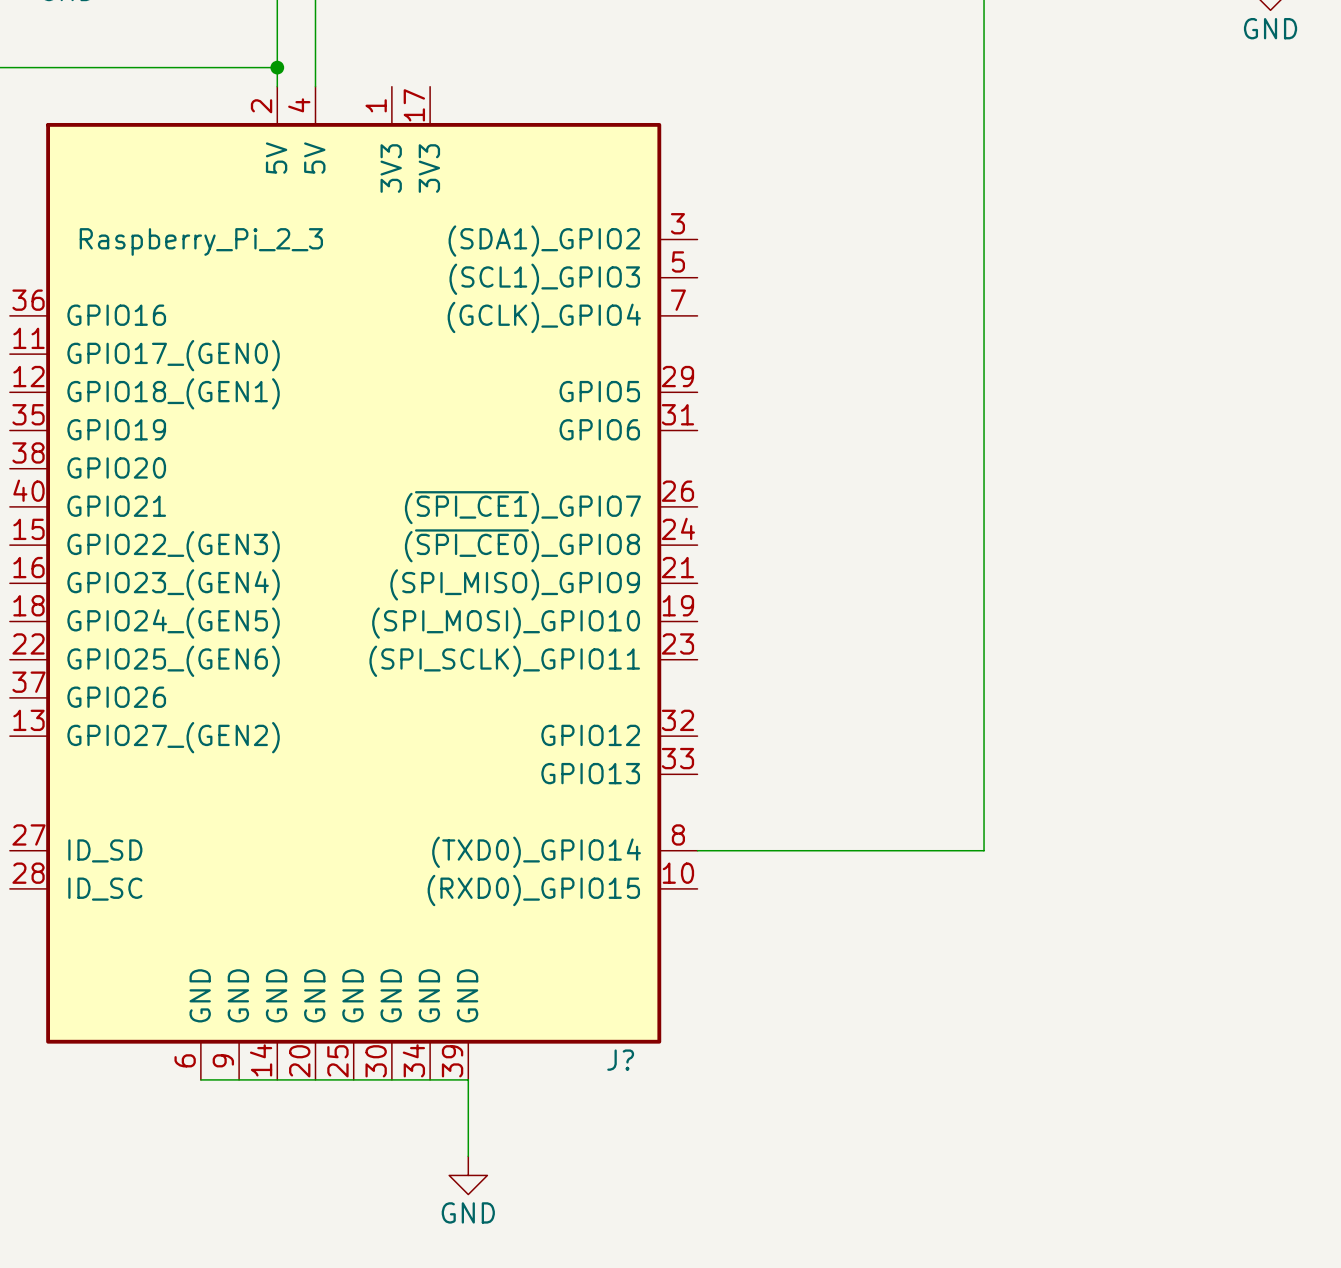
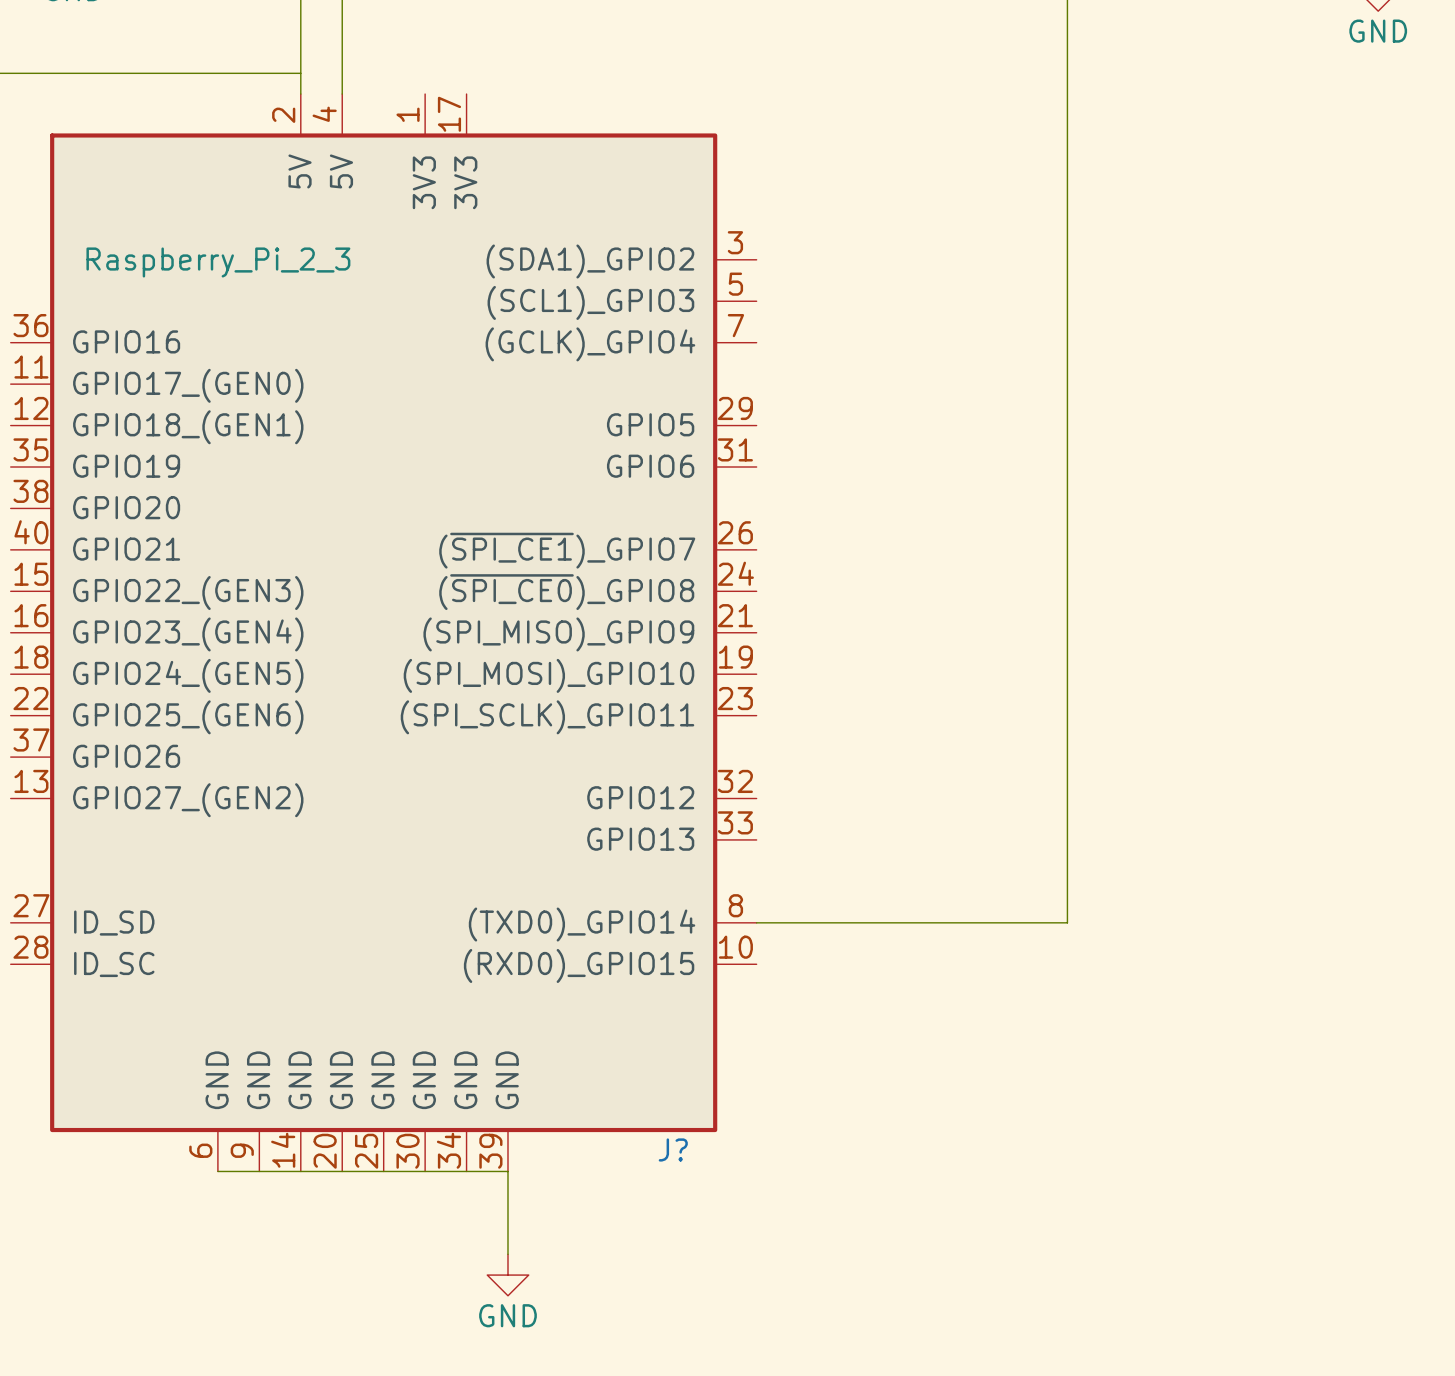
junction: (277, 67) -> none

